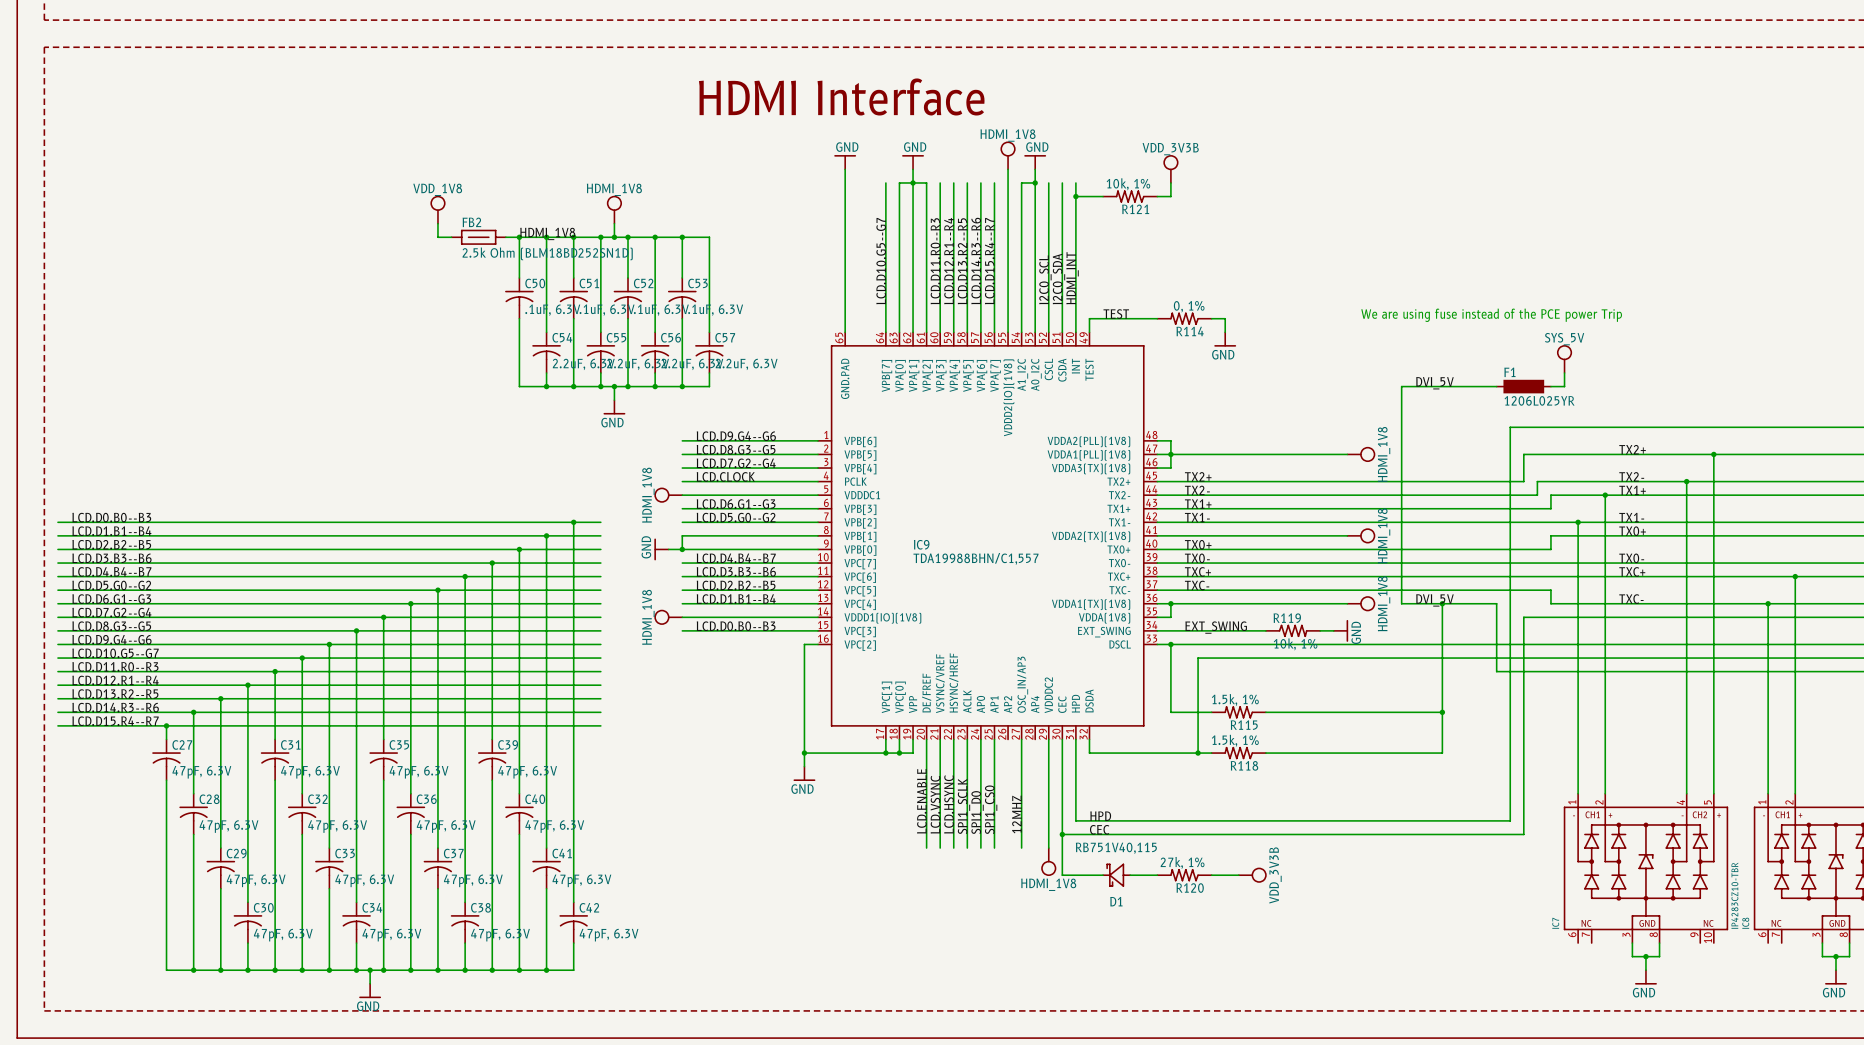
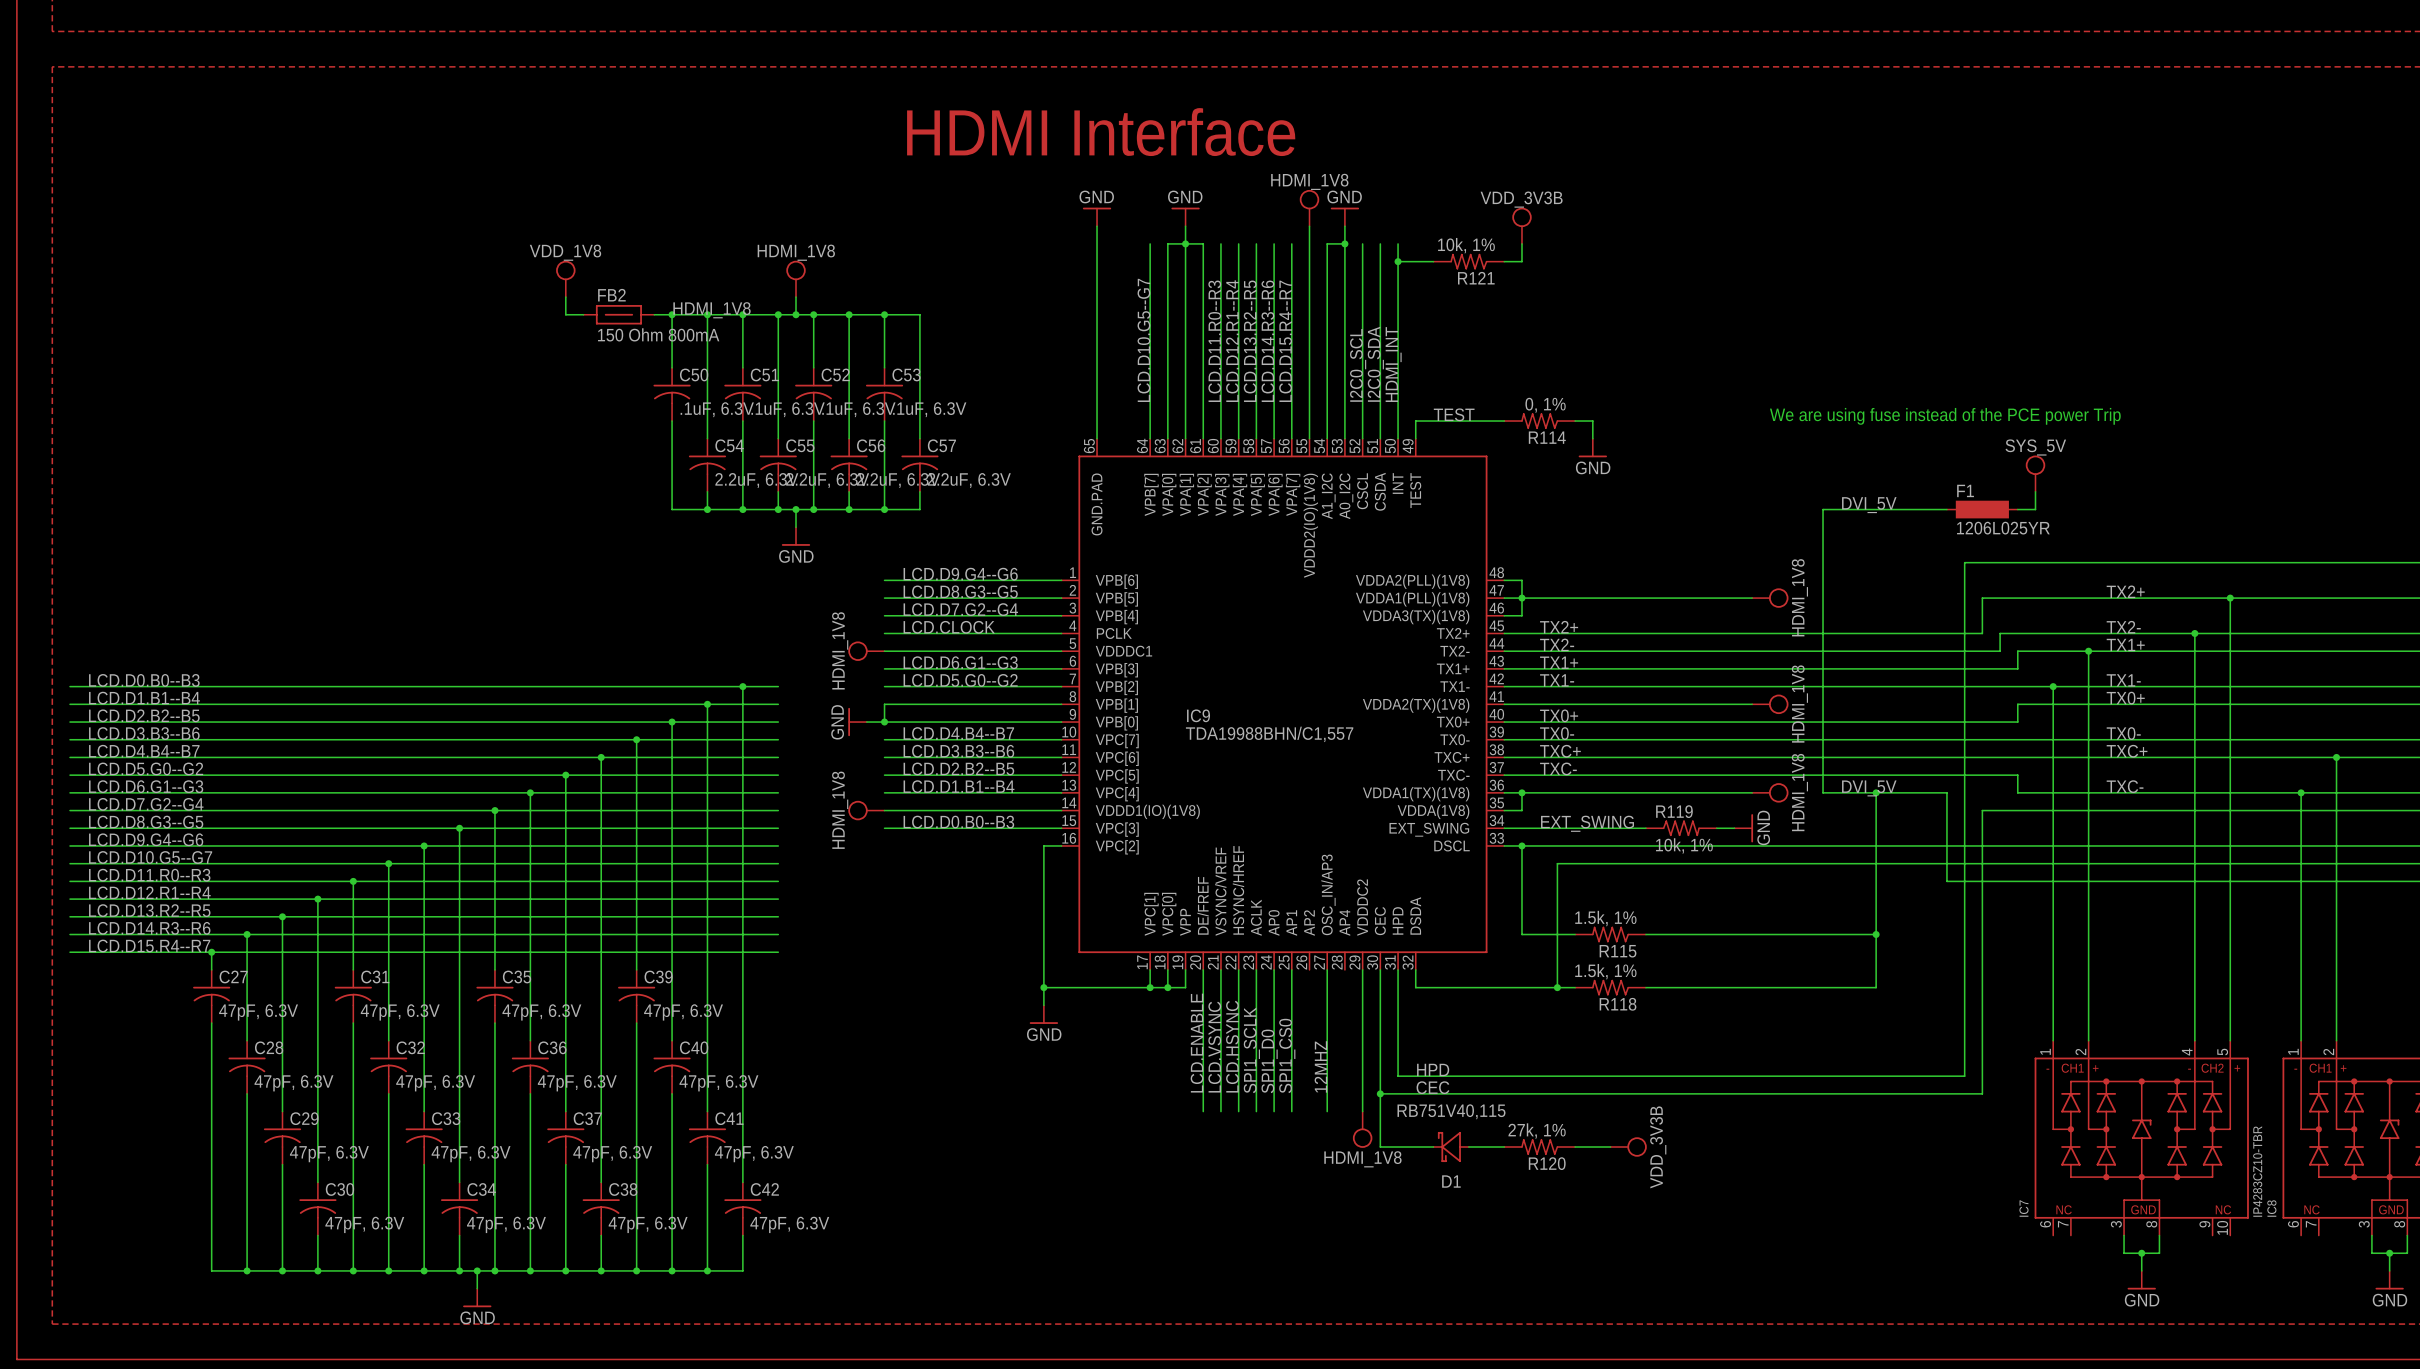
FB2 value: 2.5k Ohm (BLM18BD252SN1D) (547, 253) -> 150 Ohm 800mA (658, 334)

